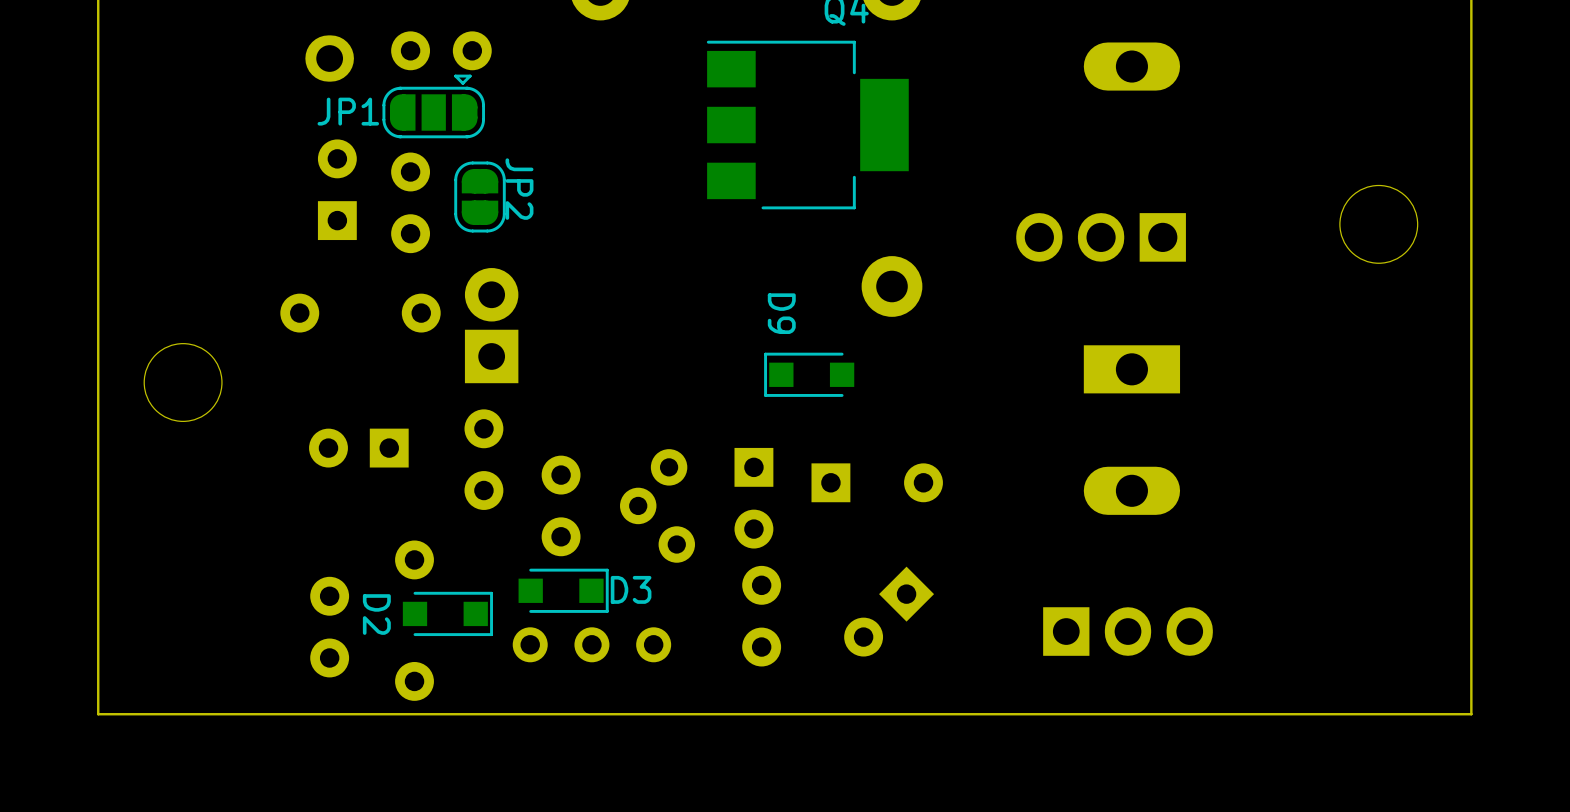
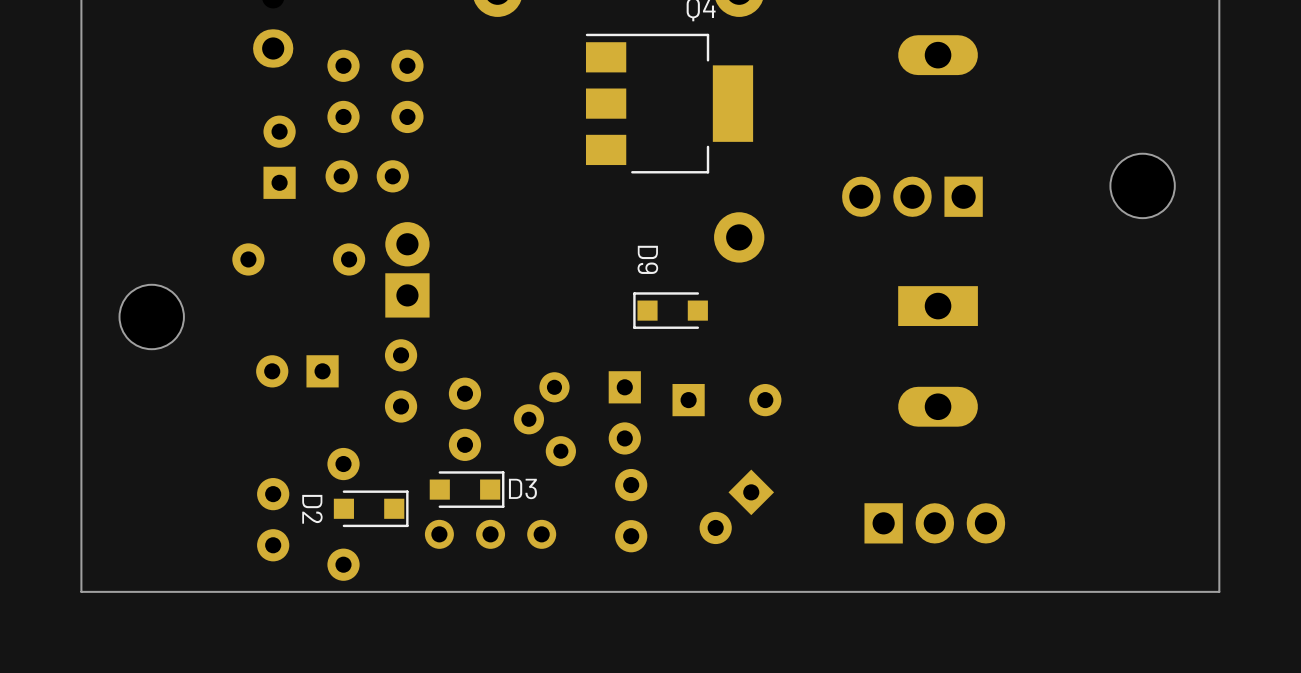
part: (441, 50) -> none
JP1: (433, 106) -> none
part: none -> (343, 91)
part: none -> (407, 91)
JP2: (480, 197) -> none
part rotation: 0° (410, 202) -> 90° clockwise (367, 176)

